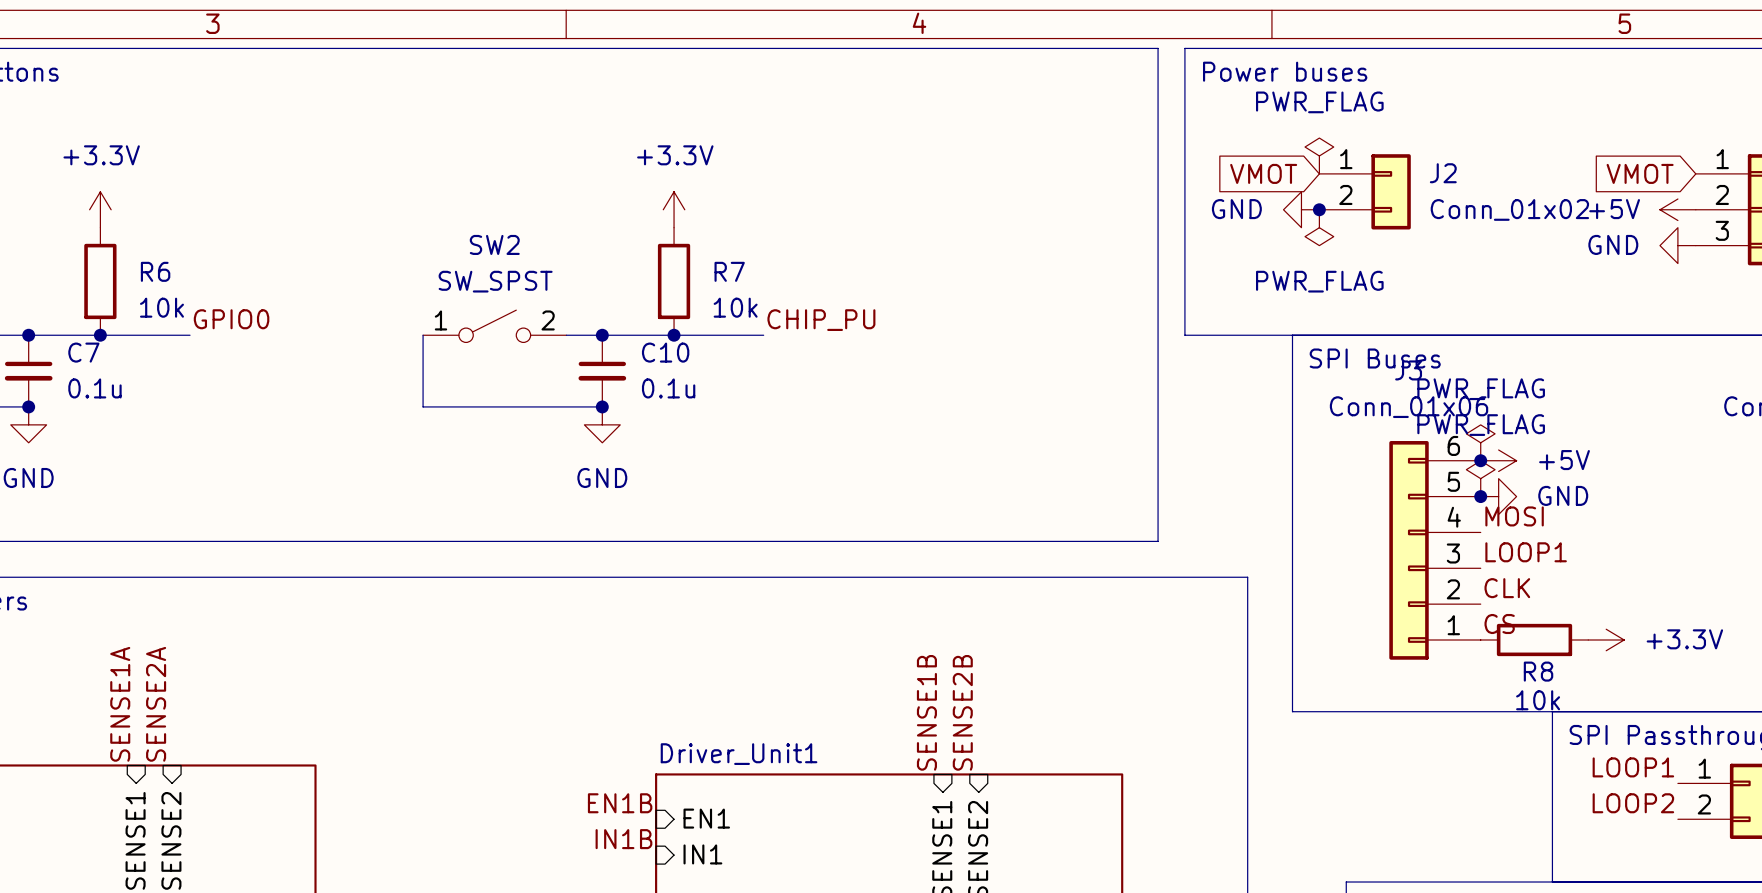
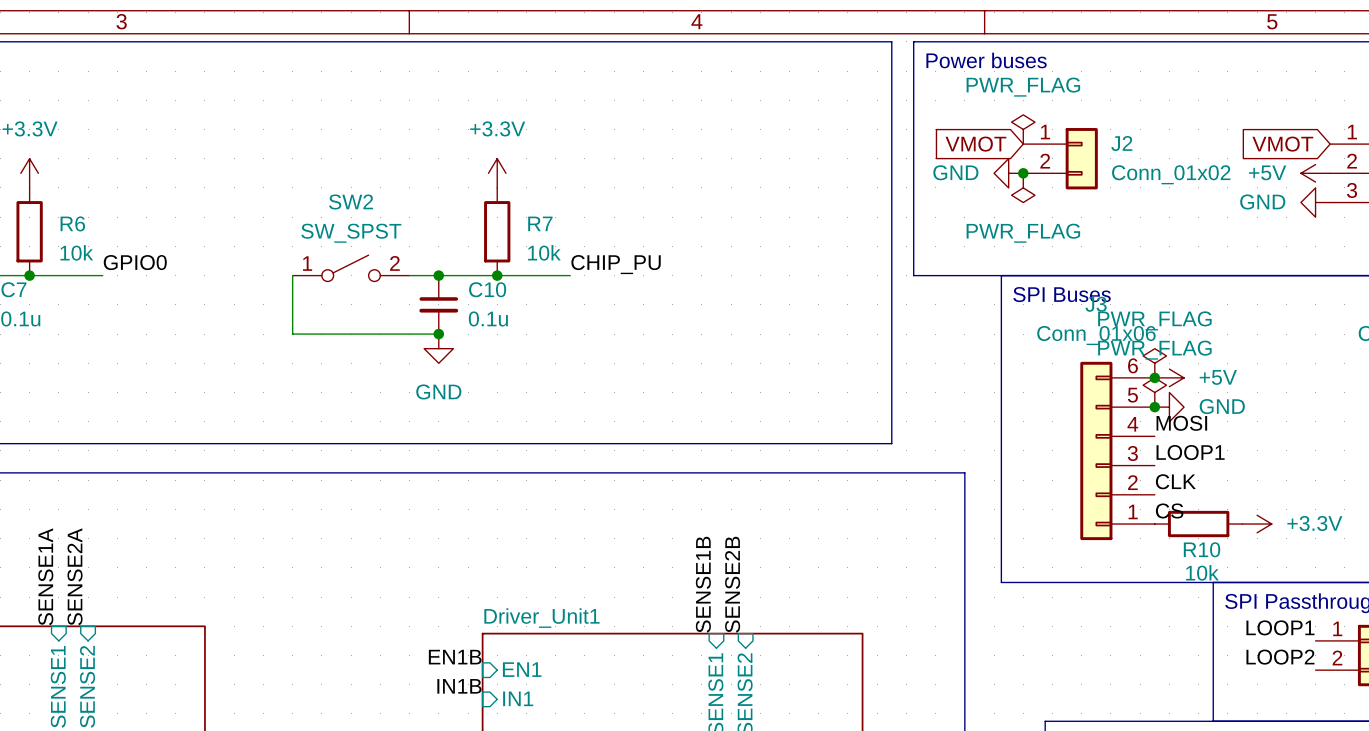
R8 name: R8 (1538, 671) -> R10 (1202, 549)

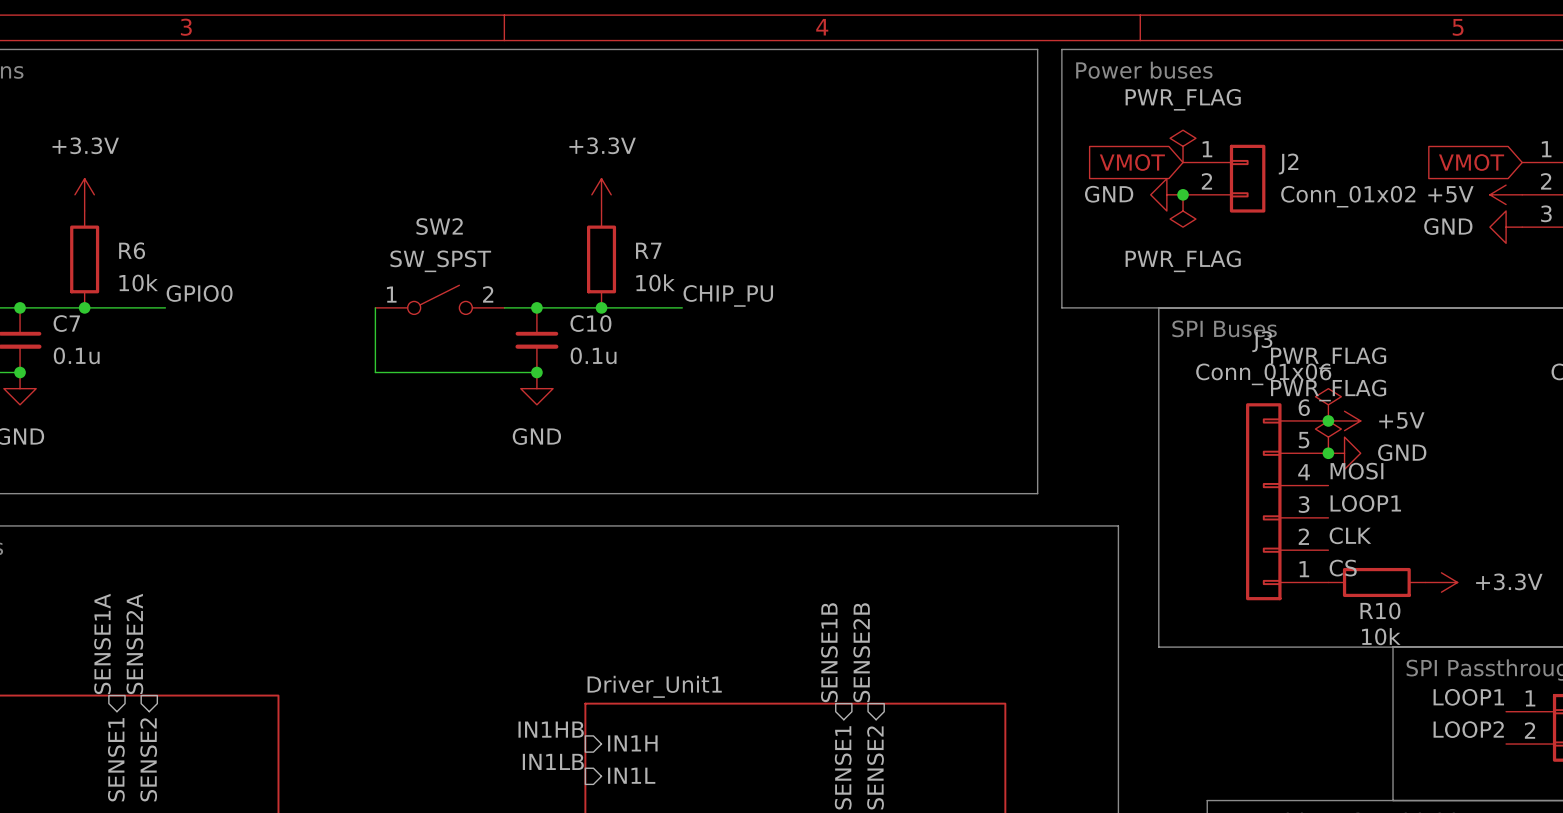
label: EN1B (455, 657) -> IN1HB (551, 729)
sheet pin: EN1 (522, 669) -> IN1H (632, 743)
label: IN1B (459, 686) -> IN1LB (553, 761)
sheet pin: IN1 (518, 698) -> IN1L (631, 775)

